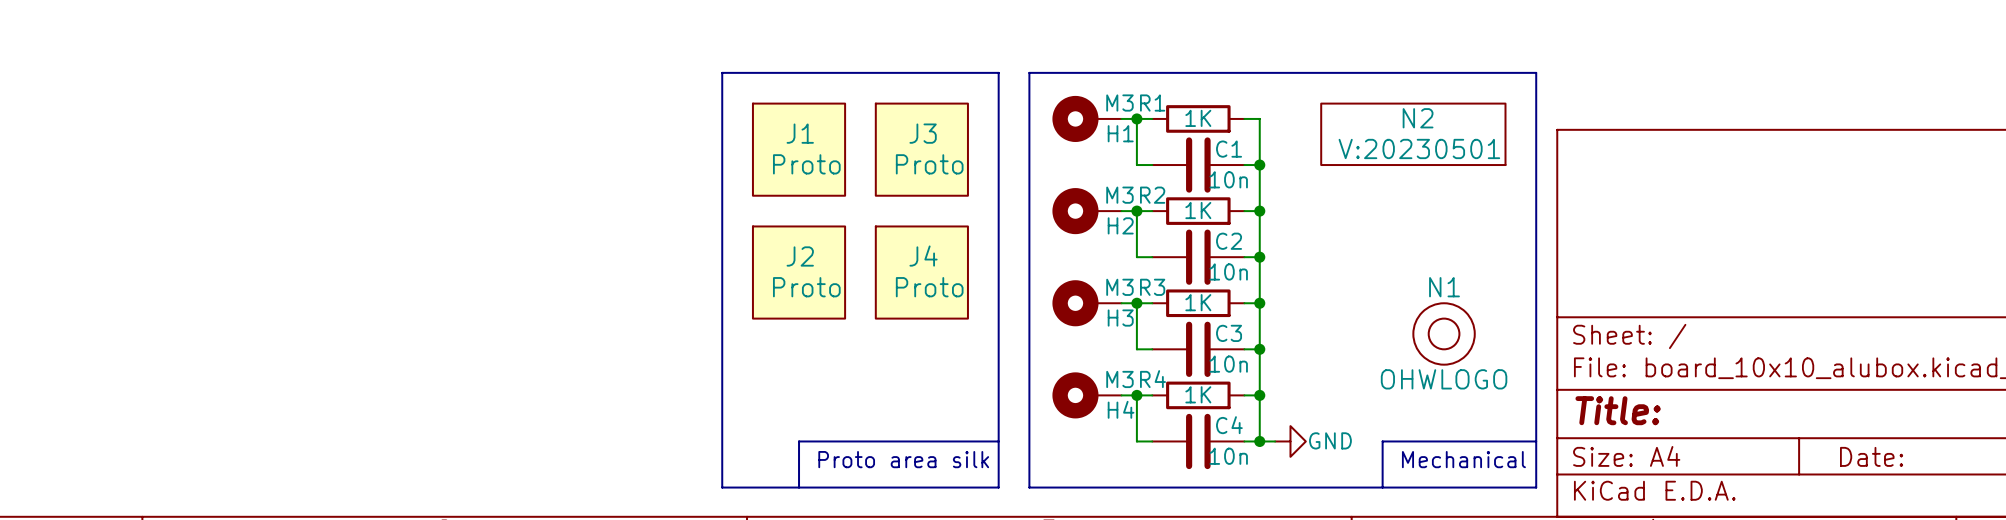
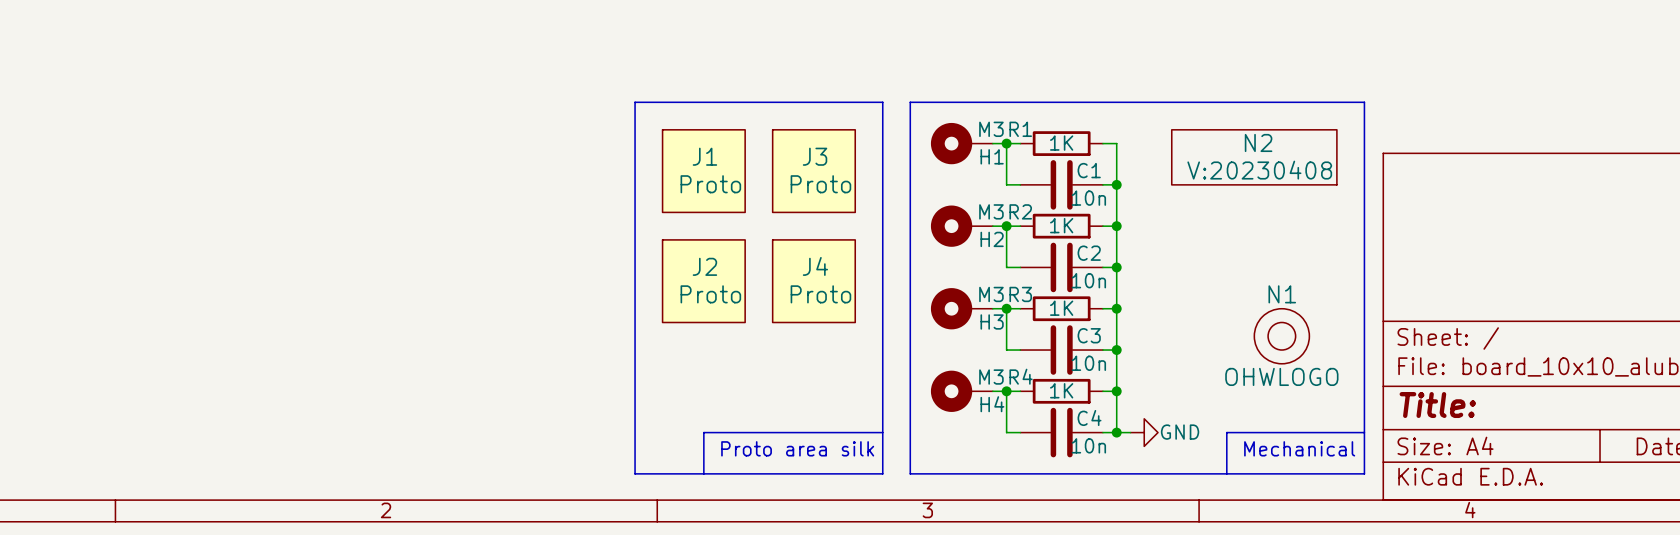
N2 value: V:20230501 (1419, 148) -> V:20230408 (1259, 170)

